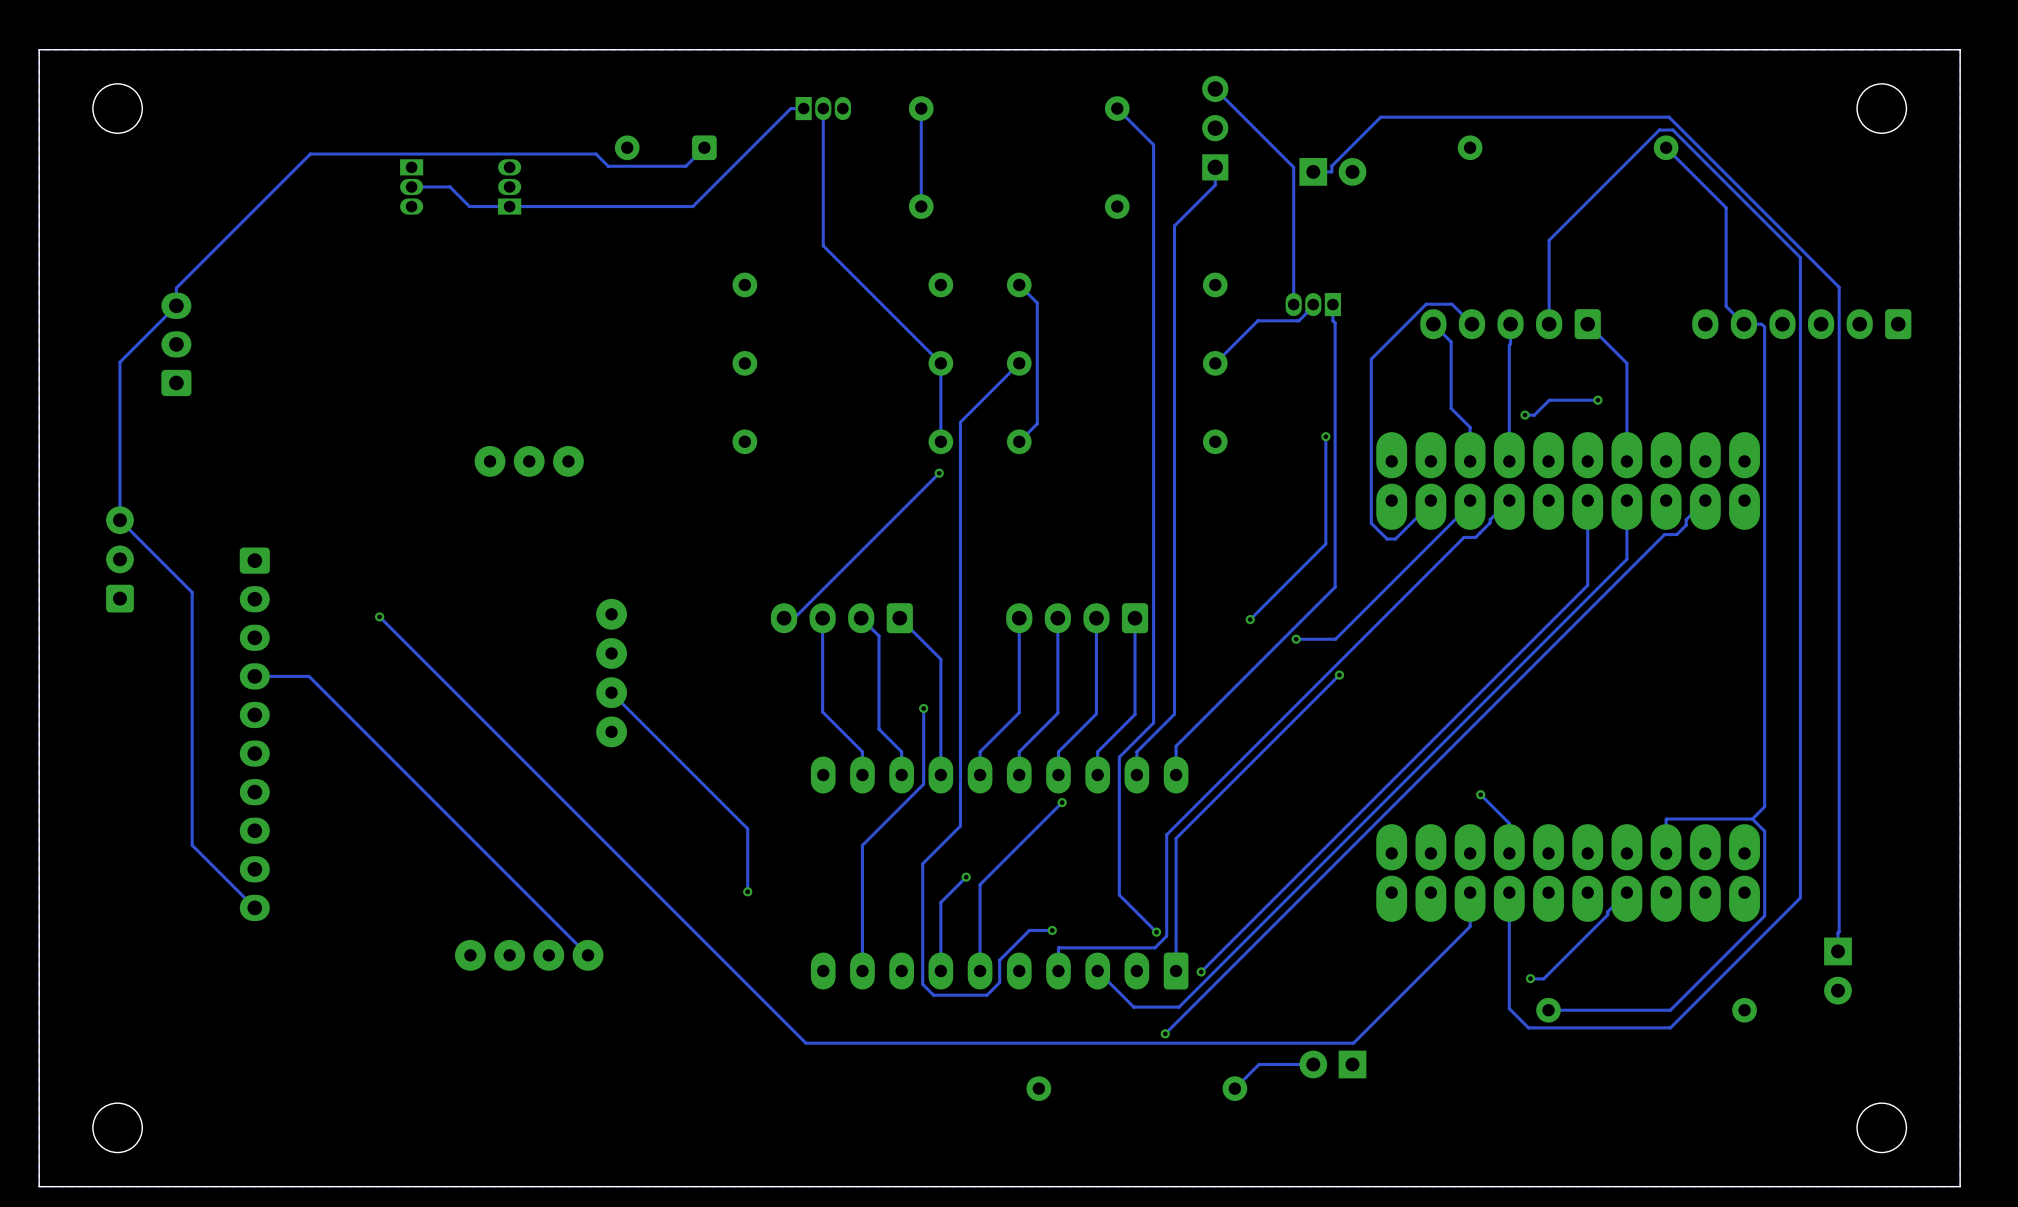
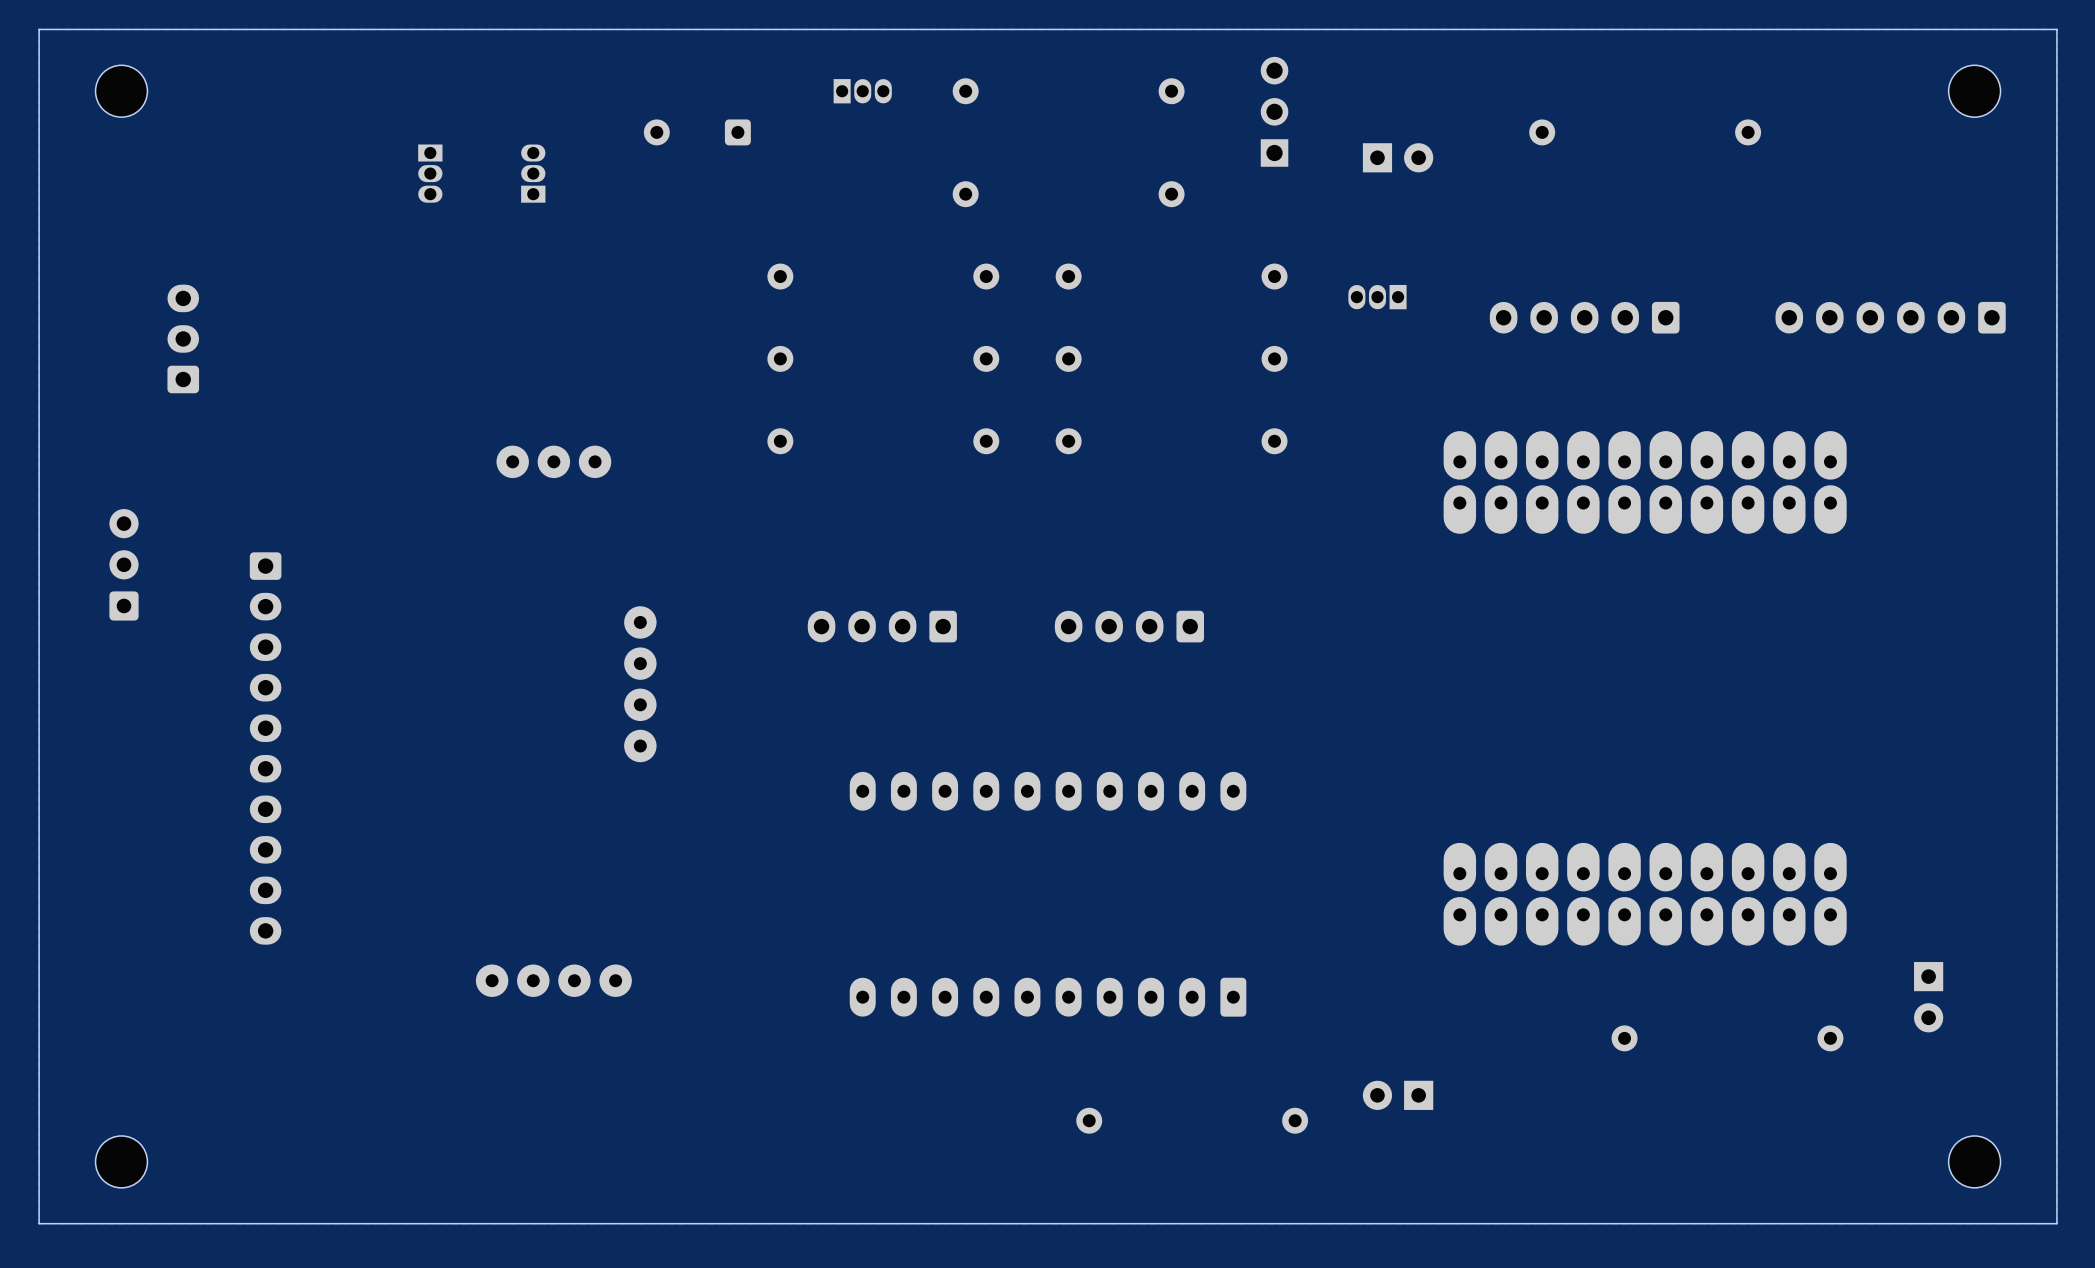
track: (1215, 88) (1293, 167) (1293, 304) -> none
track: (803, 108) (790, 108) (692, 206) (469, 206) (449, 186) (411, 186) -> none
track: (823, 108) (823, 245) (940, 363) (940, 441) -> none
track: (921, 108) (921, 206) -> none
track: (1117, 108) (1153, 144) (1153, 722) (1119, 757) (1119, 895) (1156, 932) -> none
track: (704, 147) (685, 166) (608, 166) (596, 154) (310, 154) (176, 288) (176, 305) (119, 362) (119, 520) (192, 592) (192, 845) (254, 907) -> none
track: (1666, 147) (1726, 207) (1726, 306) (1743, 324) (1761, 324) (1764, 327) (1764, 806) (1752, 819) -> none
track: (1215, 167) (1215, 185) (1174, 225) (1174, 714) (1136, 751) (1136, 775) -> none
track: (1313, 171) (1331, 171) (1331, 166) (1380, 117) (1669, 117) (1839, 287) (1837, 951) -> none
track: (1019, 284) (1037, 302) (1037, 423) (1019, 441) -> none
track: (1313, 304) (1298, 320) (1257, 320) (1215, 363) -> none
track: (1332, 304) (1332, 320) (1335, 323) (1335, 587) (1176, 746) (1176, 775) -> none
track: (1433, 324) (1451, 341) (1451, 408) (1470, 427) (1470, 461) -> none
track: (1471, 324) (1452, 304) (1426, 304) (1371, 359) (1371, 523) (1387, 539) (1395, 539) (1430, 503) (1430, 500) -> none
track: (1510, 324) (1509, 461) -> none
track: (1549, 324) (1549, 240) (1659, 130) (1672, 130) (1800, 257) (1800, 897) (1670, 1027) (1528, 1027) (1509, 1008) (1509, 892) -> none
track: (1587, 324) (1626, 363) (1626, 461) -> none
track: (1019, 363) (960, 422) (960, 826) (922, 863) (922, 984) (933, 995) (987, 995) (999, 982) (999, 960) (1029, 930) (1052, 930) -> none
track: (1597, 400) (1549, 400) (1534, 415) (1524, 415) -> none
via: (1597, 400) -> none
via: (1524, 415) -> none
track: (1325, 436) (1325, 543) (1250, 619) -> none
via: (1325, 436) -> none
track: (939, 473) (794, 618) (784, 618) -> none
via: (939, 473) -> none
track: (1470, 500) (1470, 504) (1335, 639) (1296, 639) -> none
track: (1509, 500) (1475, 537) (1464, 537) (1166, 834) (1166, 936) (1154, 947) (1058, 947) (1058, 971) -> none
track: (1587, 500) (1587, 585) (1201, 971) -> none
track: (1626, 500) (1626, 559) (1179, 1007) (1133, 1007) (1097, 971) -> none
track: (1705, 500) (1686, 519) (1686, 525) (1676, 534) (1664, 534) (1165, 1033) -> none
track: (379, 616) (805, 1043) (1353, 1043) (1470, 926) (1470, 892) -> none
via: (379, 616) -> none
track: (822, 618) (822, 712) (862, 751) (862, 775) -> none
track: (861, 618) (879, 635) (879, 729) (901, 751) (901, 775) -> none
track: (899, 618) (940, 659) (940, 775) -> none
track: (1019, 618) (1019, 712) (980, 751) (980, 775) -> none
track: (1057, 618) (1057, 713) (1019, 751) (1019, 775) -> none
track: (1096, 618) (1096, 713) (1058, 751) (1058, 775) -> none
track: (1135, 618) (1135, 714) (1097, 751) (1097, 775) -> none
via: (1250, 619) -> none
via: (1296, 639) -> none
track: (1339, 675) (1176, 838) (1176, 971) -> none
via: (1339, 675) -> none
track: (254, 676) (309, 676) (588, 955) -> none
track: (611, 692) (747, 828) (747, 891) -> none
track: (923, 708) (923, 784) (862, 845) (862, 971) -> none
via: (923, 708) -> none
track: (1480, 794) (1509, 823) (1509, 853) -> none
via: (1480, 794) -> none
track: (1062, 802) (980, 884) (980, 971) -> none
via: (1062, 802) -> none
track: (1752, 819) (1764, 831) (1764, 915) (1670, 1010) (1548, 1010) -> none
track: (1752, 819) (1666, 819) (1666, 853) -> none
track: (966, 877) (940, 902) (940, 971) -> none
via: (966, 877) -> none
via: (747, 891) -> none
track: (1626, 892) (1607, 911) (1607, 914) (1543, 978) (1530, 978) -> none
via: (1052, 930) -> none
via: (1156, 932) -> none
via: (1201, 971) -> none
via: (1530, 978) -> none
via: (1165, 1033) -> none
track: (1313, 1064) (1259, 1064) (1234, 1088) -> none

